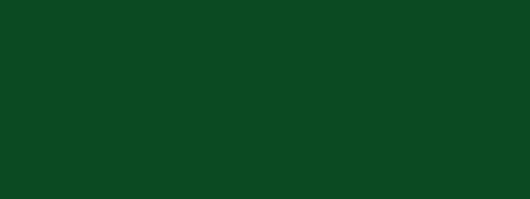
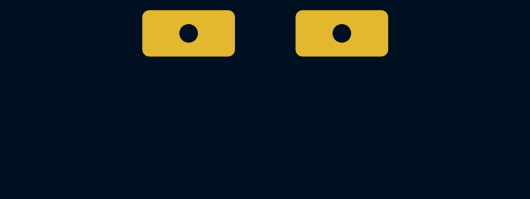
part: none -> (265, 33)

